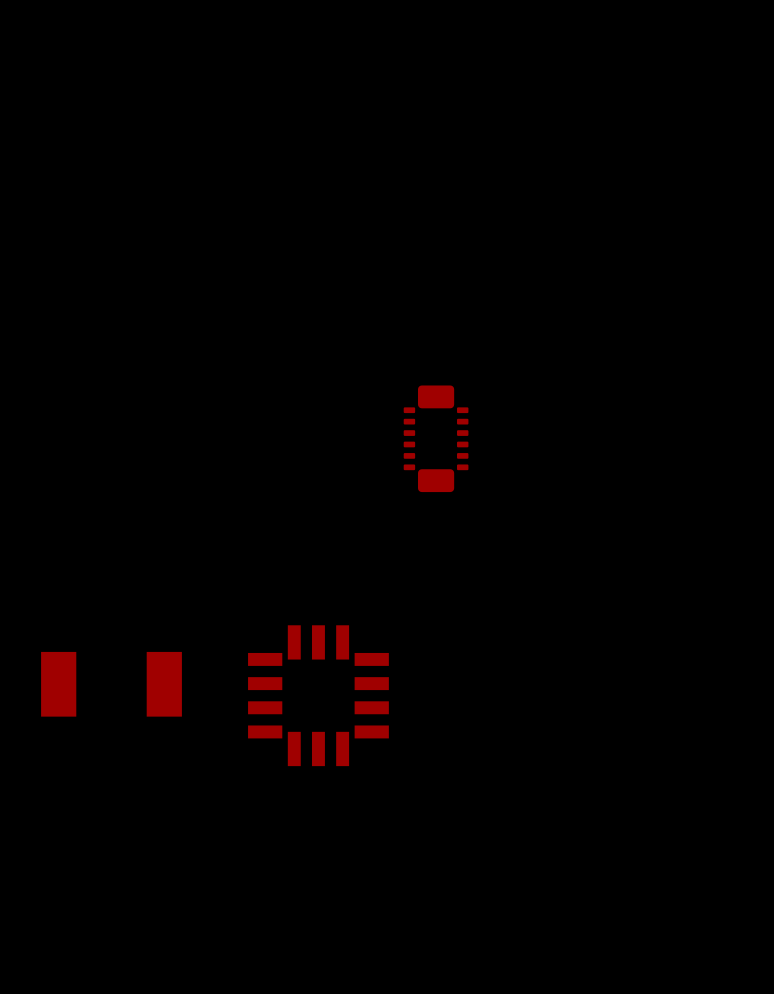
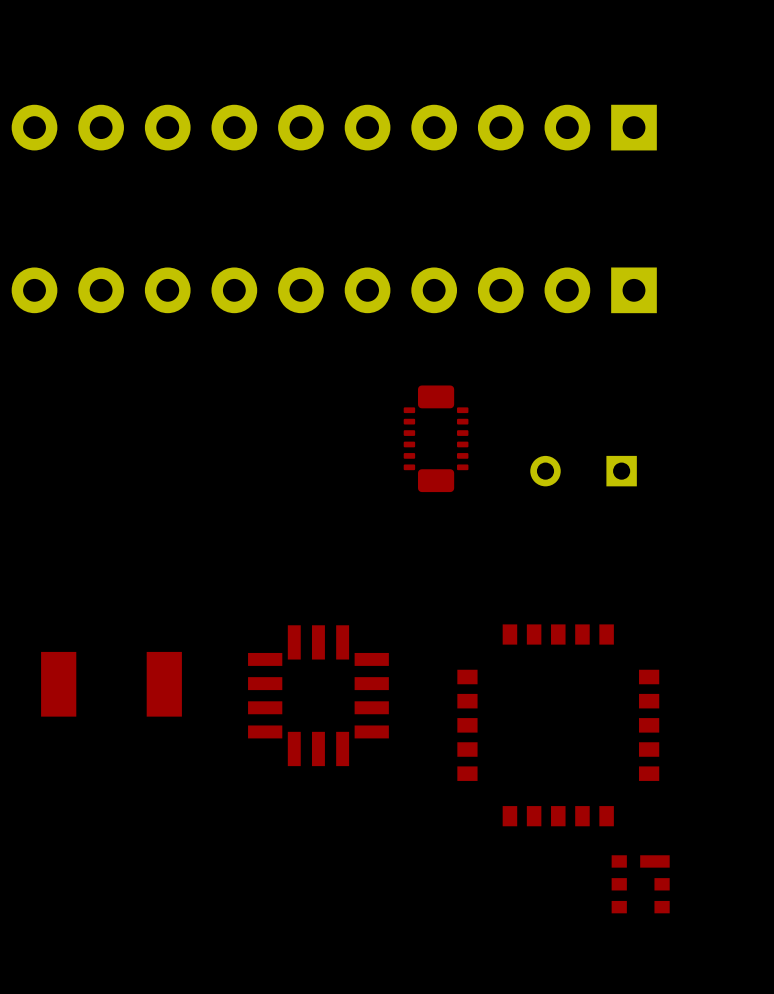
part: none -> (334, 127)
part: none -> (334, 290)
part: none -> (583, 471)
part: none -> (558, 725)
part: none -> (640, 884)

